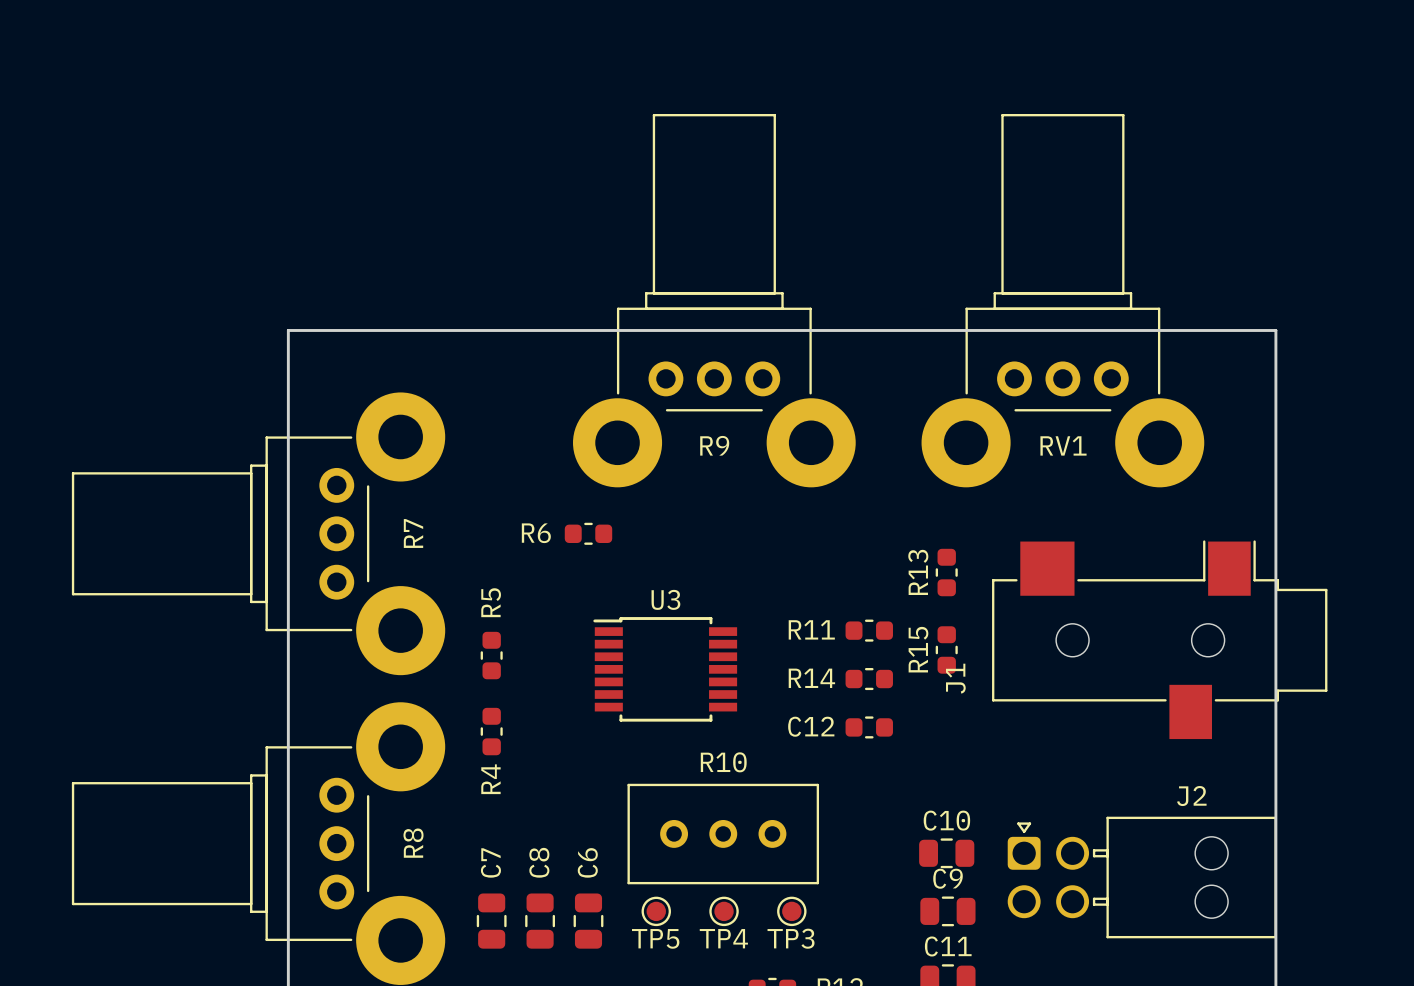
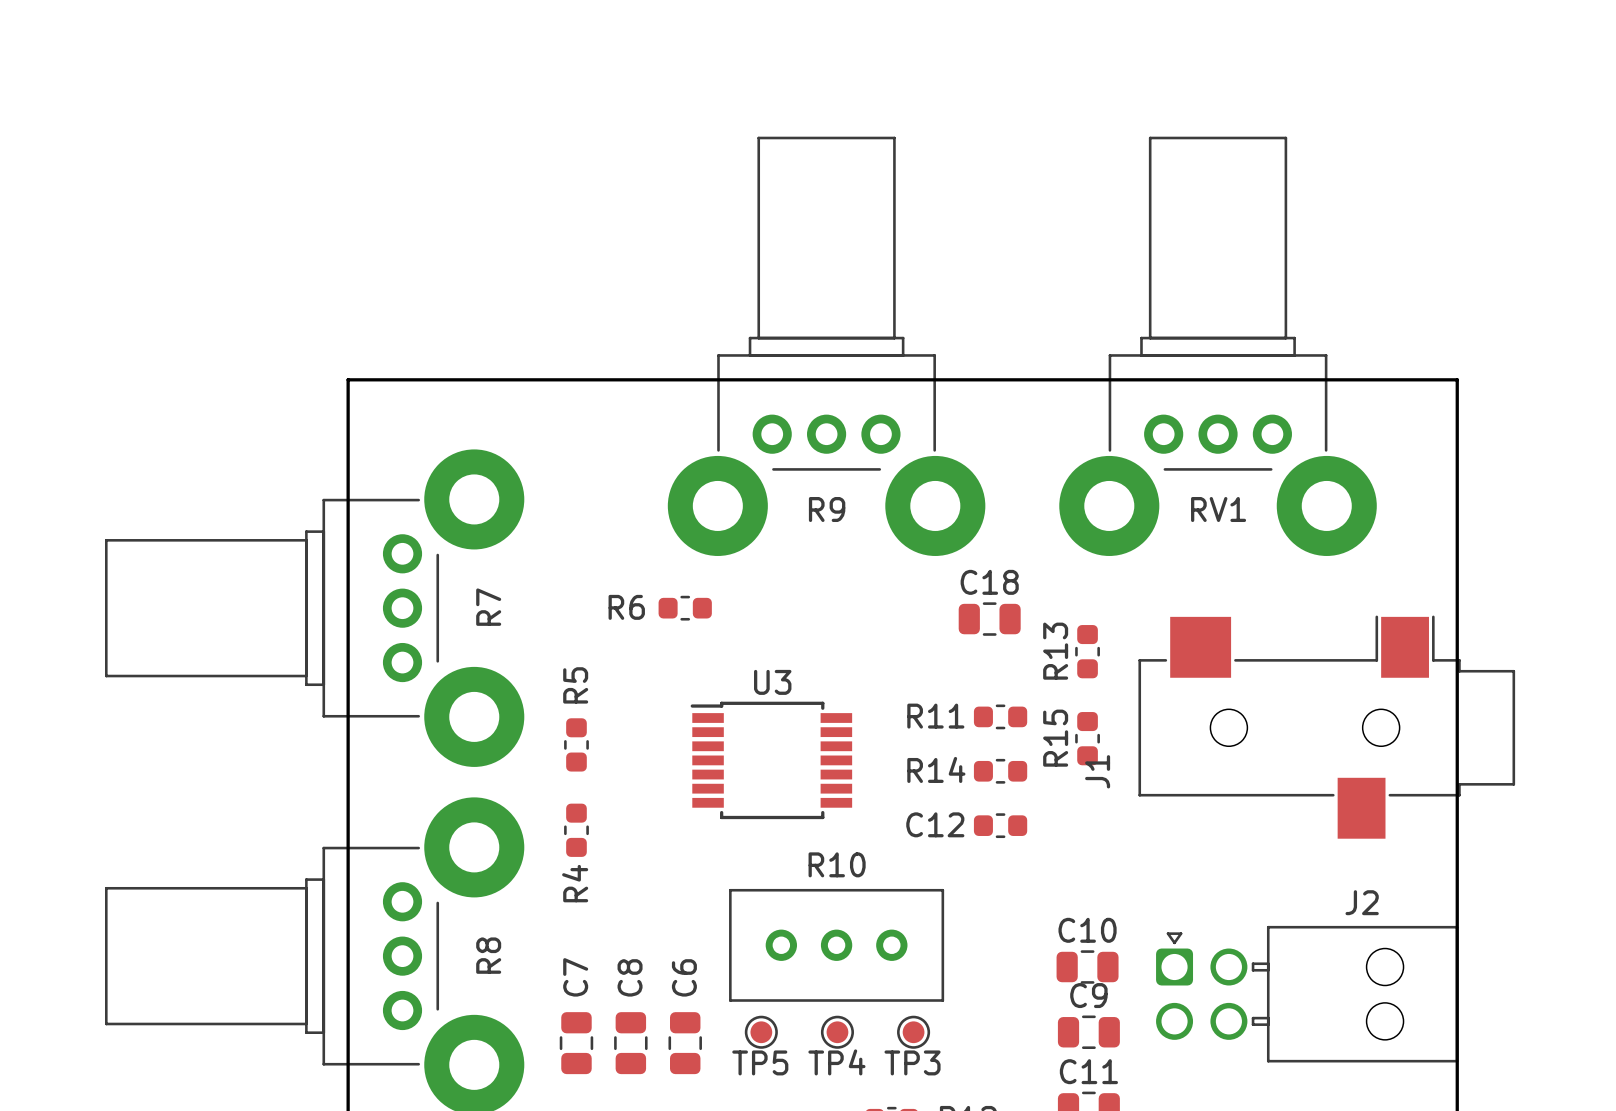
C18: none -> (989, 619)

